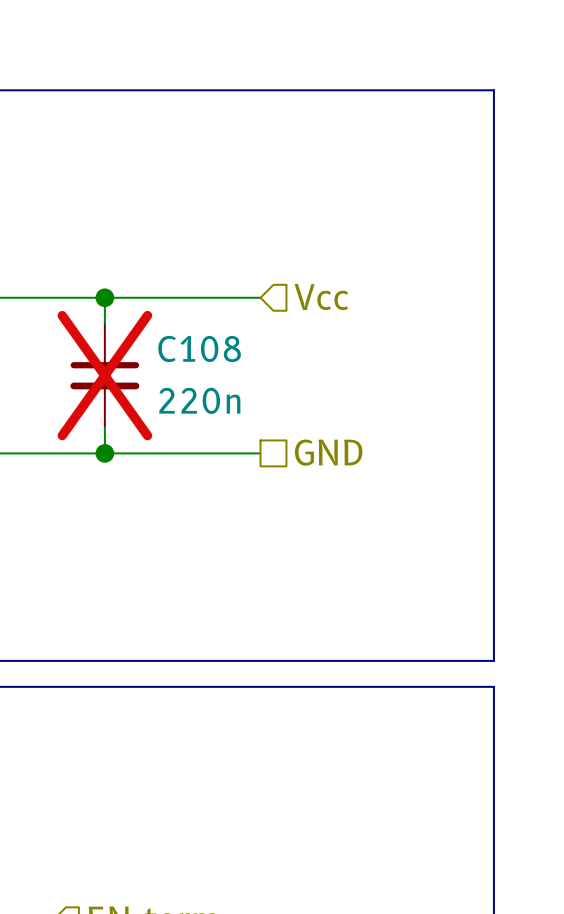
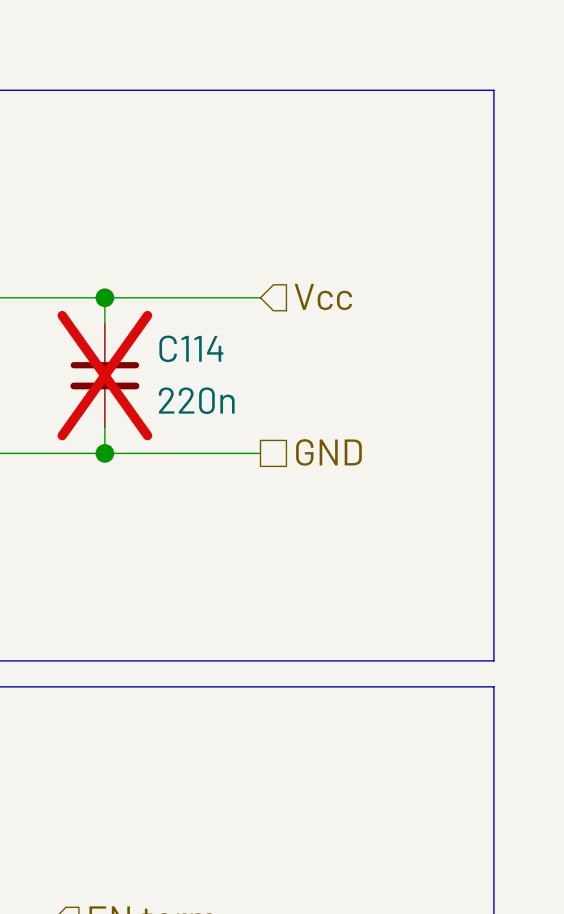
C108 name: C108 (199, 348) -> C114 (191, 348)

